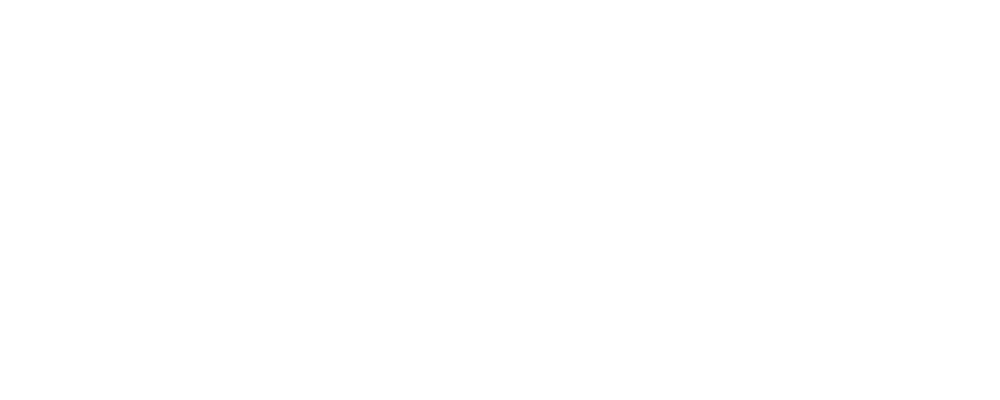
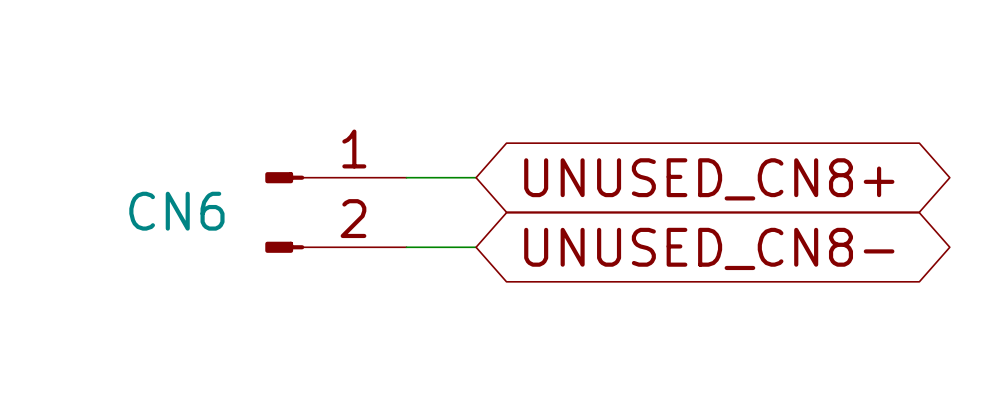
wire: none -> (406, 177) (476, 177)
global label: none -> UNUSED_CN8+ (709, 179)
CN6: none -> (335, 212)
wire: none -> (406, 247) (476, 247)
global label: none -> UNUSED_CN8- (709, 248)

